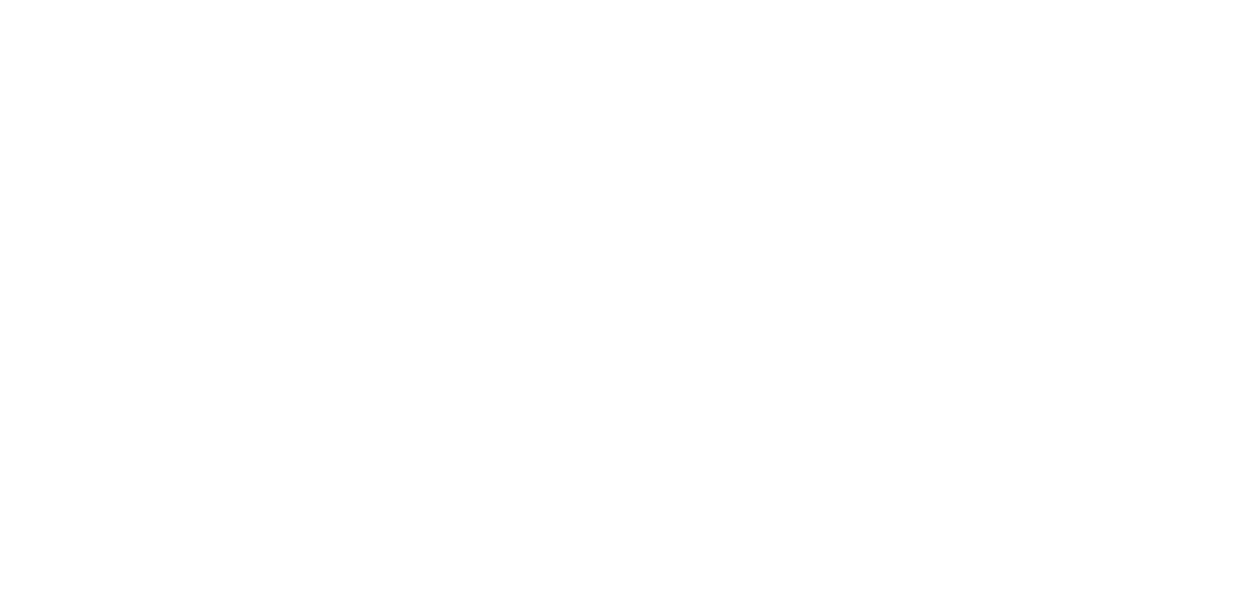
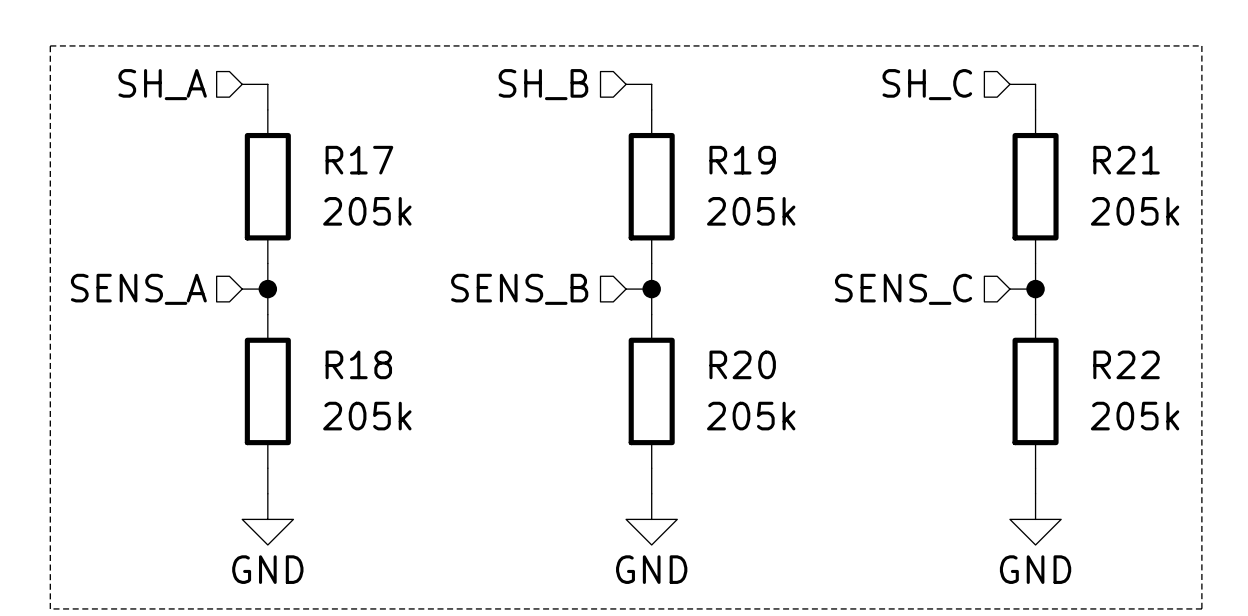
line: none -> (50, 45) (1201, 45) (1201, 608) (50, 608) (50, 45)
hierarchical label: none -> SH_A (162, 84)
wire: none -> (242, 84) (267, 84) (267, 109)
hierarchical label: none -> SH_B (543, 84)
wire: none -> (626, 84) (651, 84) (651, 109)
hierarchical label: none -> SH_C (927, 84)
wire: none -> (1009, 84) (1035, 84) (1035, 109)
R17: none -> 205k (267, 186)
R19: none -> 205k (651, 186)
R21: none -> 205k (1035, 186)
wire: none -> (267, 263) (267, 314)
wire: none -> (651, 263) (651, 314)
wire: none -> (1035, 263) (1035, 314)
hierarchical label: none -> SENS_A (138, 289)
wire: none -> (242, 289) (267, 289)
junction: none -> (267, 289)
hierarchical label: none -> SENS_B (519, 289)
wire: none -> (626, 289) (651, 289)
junction: none -> (651, 289)
hierarchical label: none -> SENS_C (903, 289)
wire: none -> (1009, 289) (1035, 289)
junction: none -> (1035, 289)
R18: none -> 205k (267, 391)
R20: none -> 205k (651, 391)
R22: none -> 205k (1035, 391)
wire: none -> (267, 468) (267, 493)
wire: none -> (651, 468) (651, 493)
wire: none -> (1035, 468) (1035, 493)
power symbol: none -> GND (267, 519)
power symbol: none -> GND (651, 519)
power symbol: none -> GND (1035, 519)

